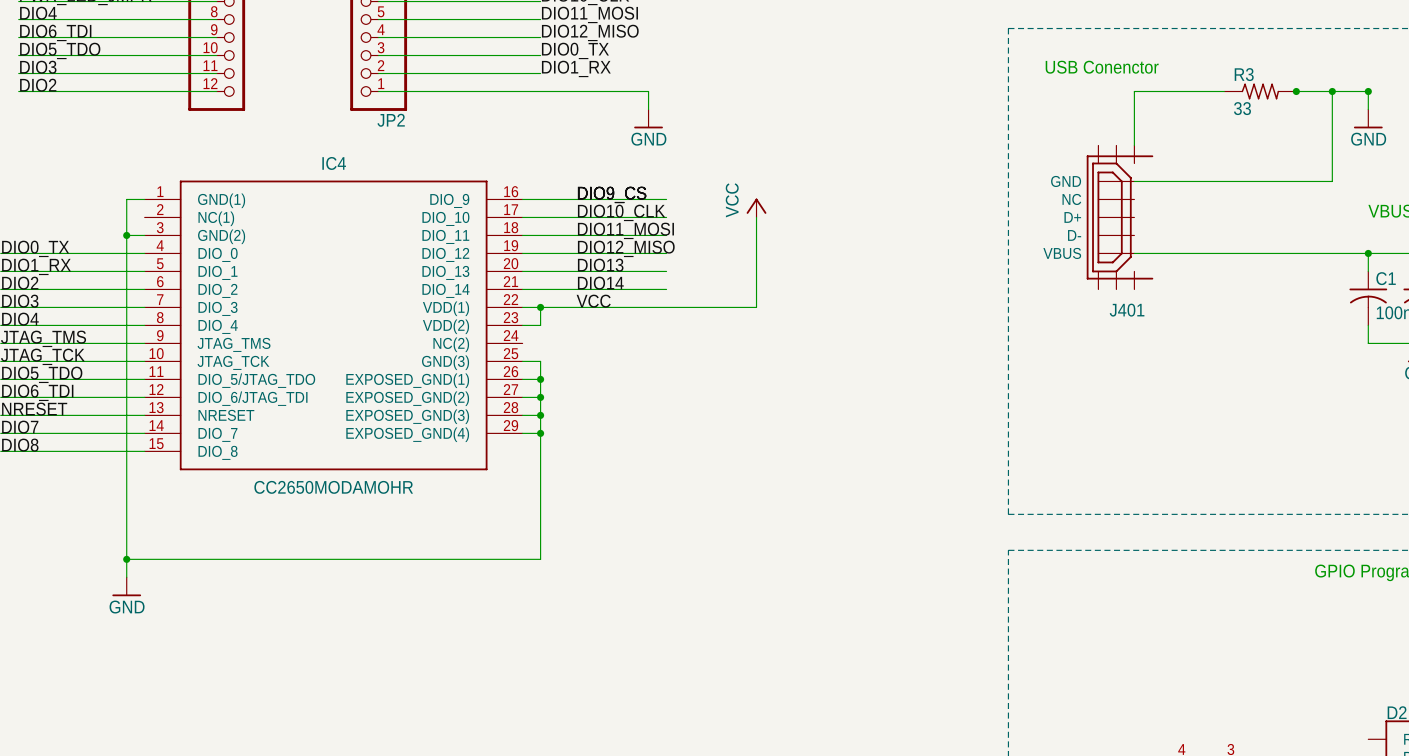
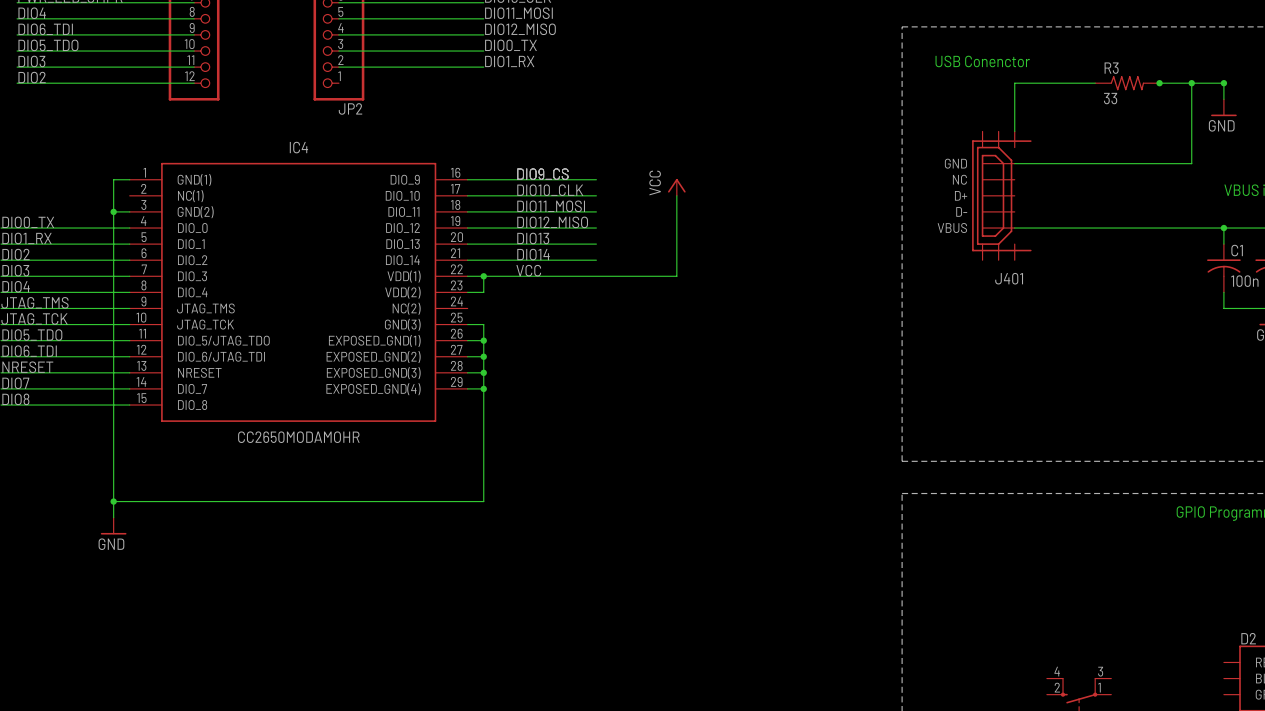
wire: (378, 91) (648, 91) (648, 109) -> none
power symbol: GND (648, 118) -> none

